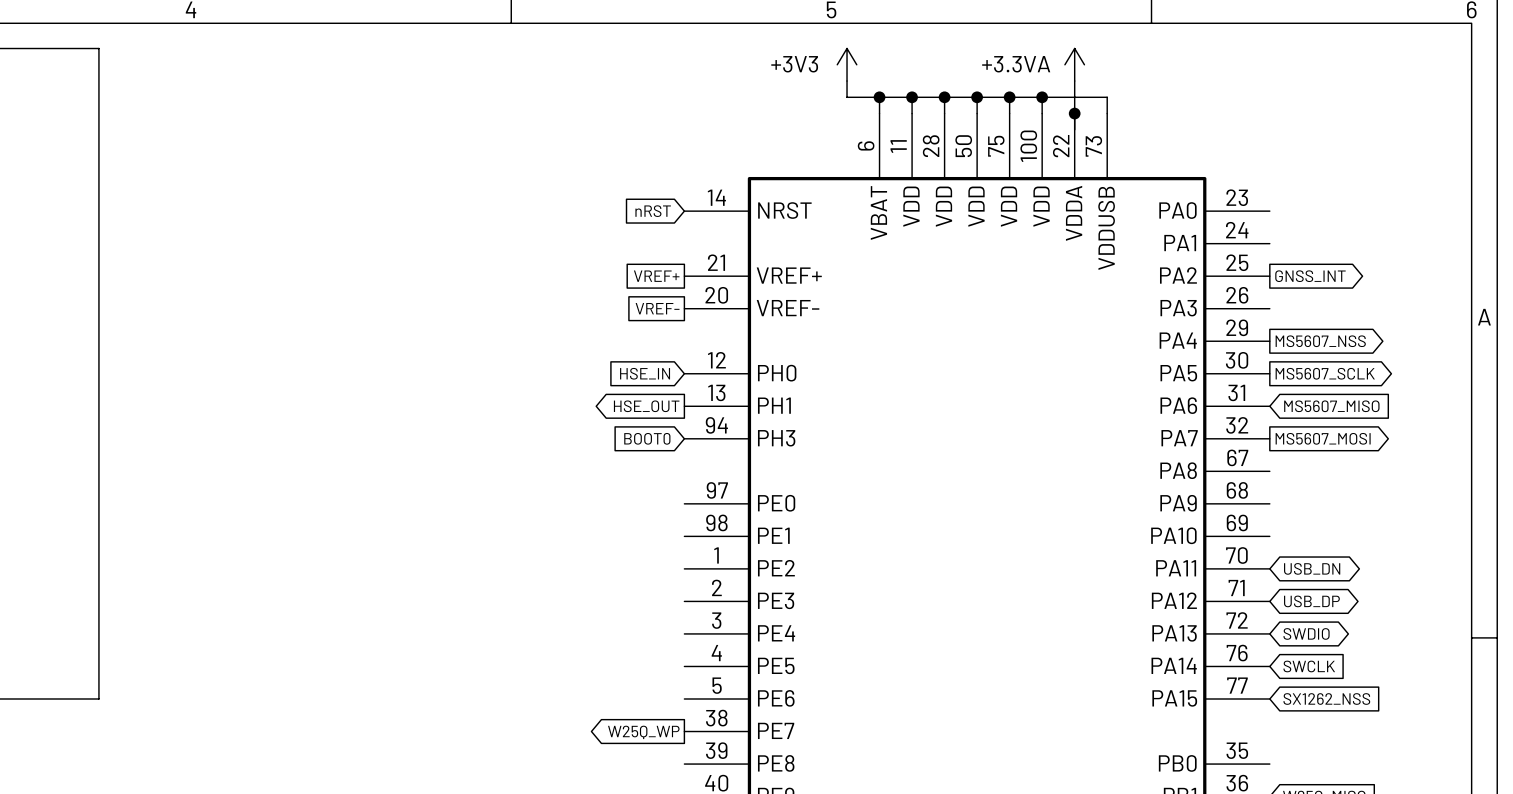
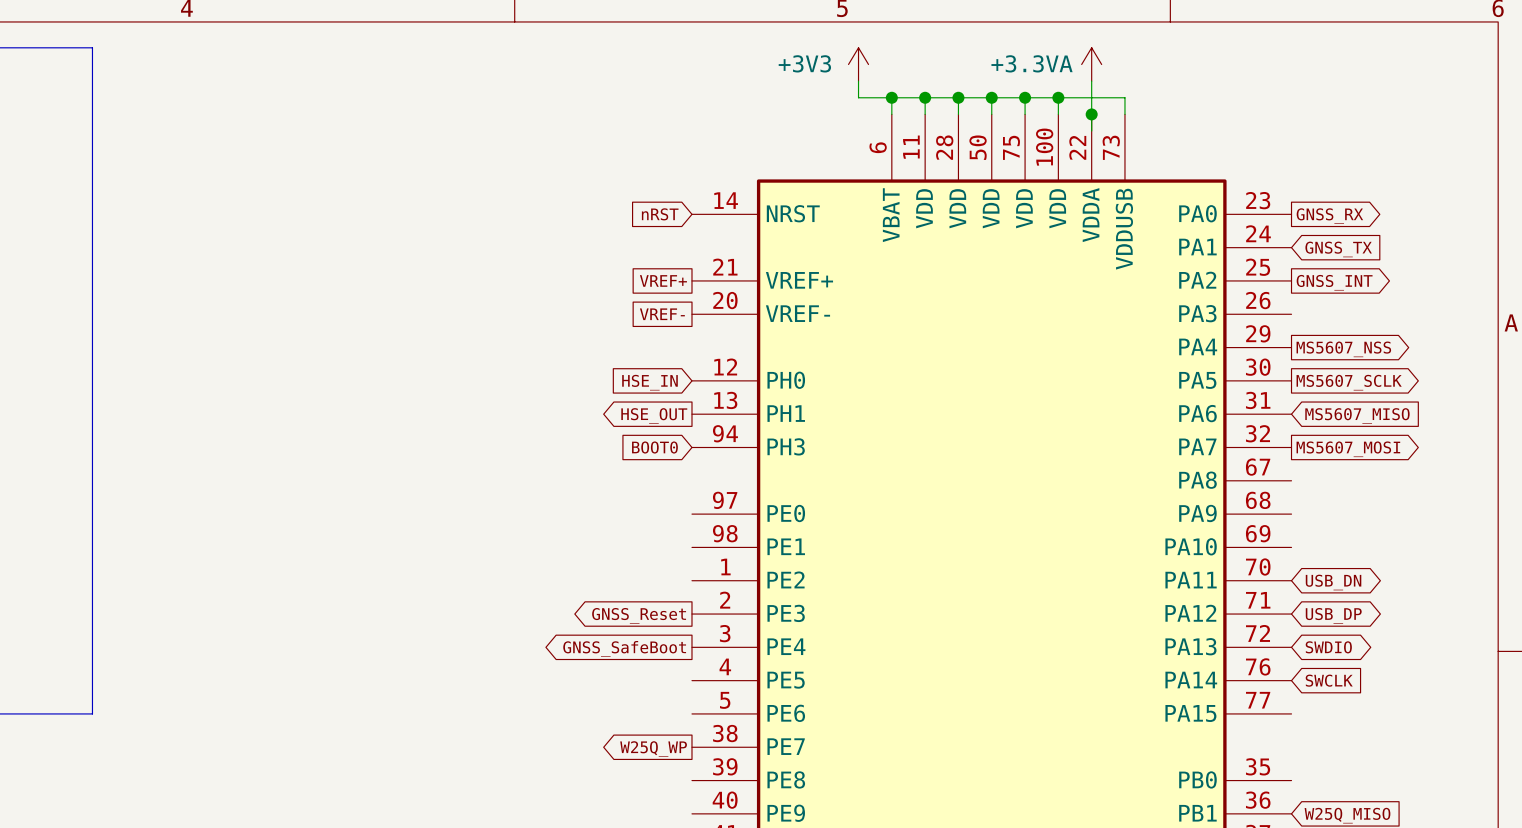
global label: none -> GNSS_RX (1329, 216)
global label: none -> GNSS_TX (1338, 249)
global label: none -> GNSS_Reset (639, 615)
global label: none -> GNSS_SafeBoot (624, 648)
global label: SX1262_NSS (1326, 699) -> none

